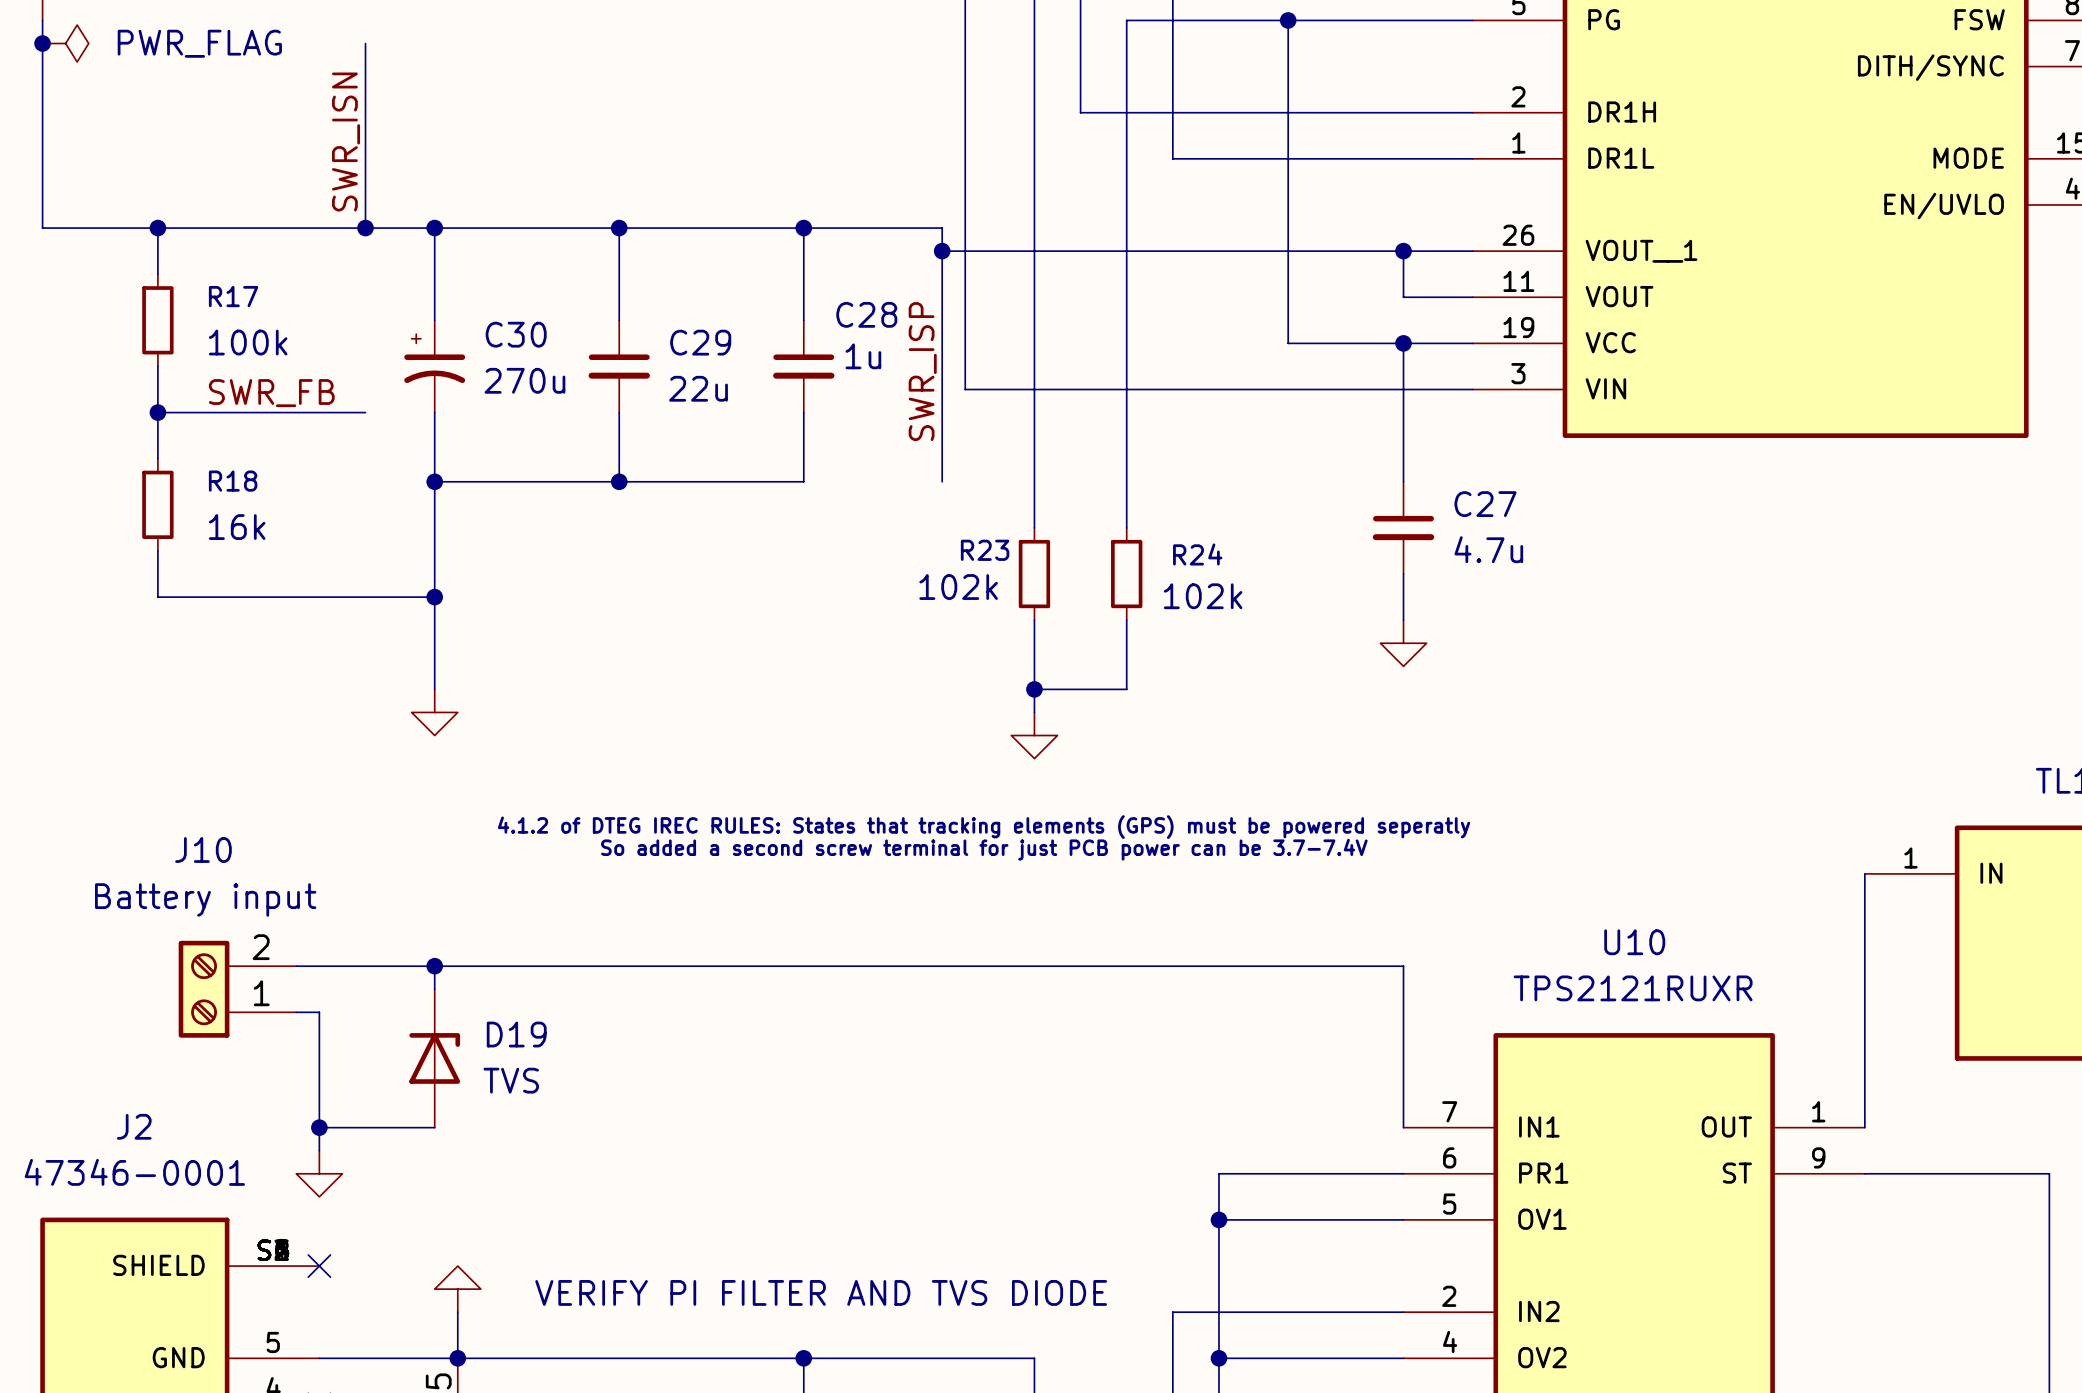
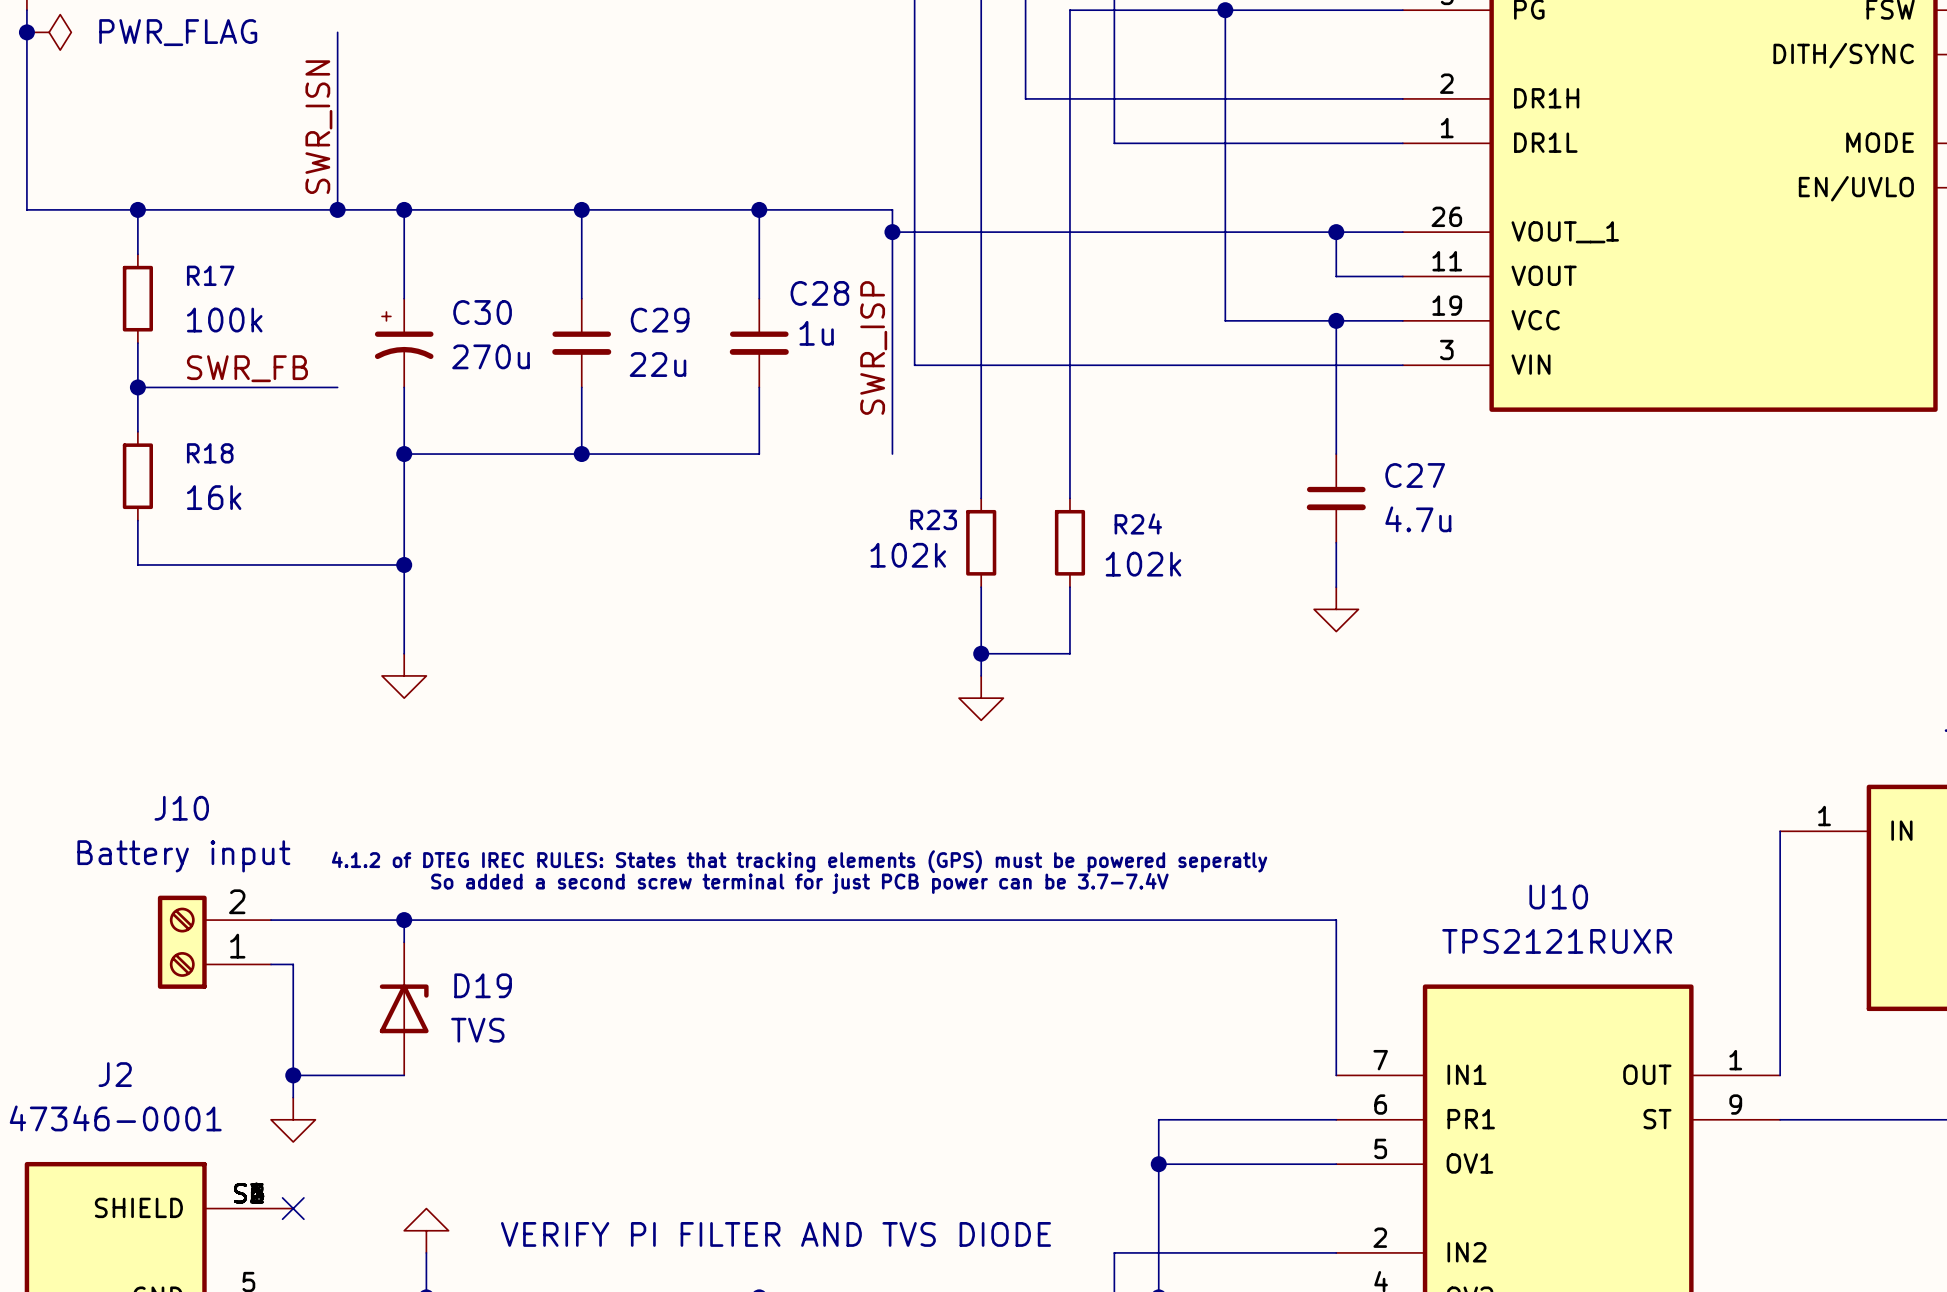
text position: 4.1.2 of DTEG IREC RULES: States that tracking elements (GPS) must be powered seperatly (984, 827) -> 4.1.2 of DTEG IREC RULES: States that tracking elements (GPS) must be powered seperatly (799, 861)
text position: So added a second screw terminal for just PCB power can be 3.7-7.4V (984, 849) -> So added a second screw terminal for just PCB power can be 3.7-7.4V (799, 883)

